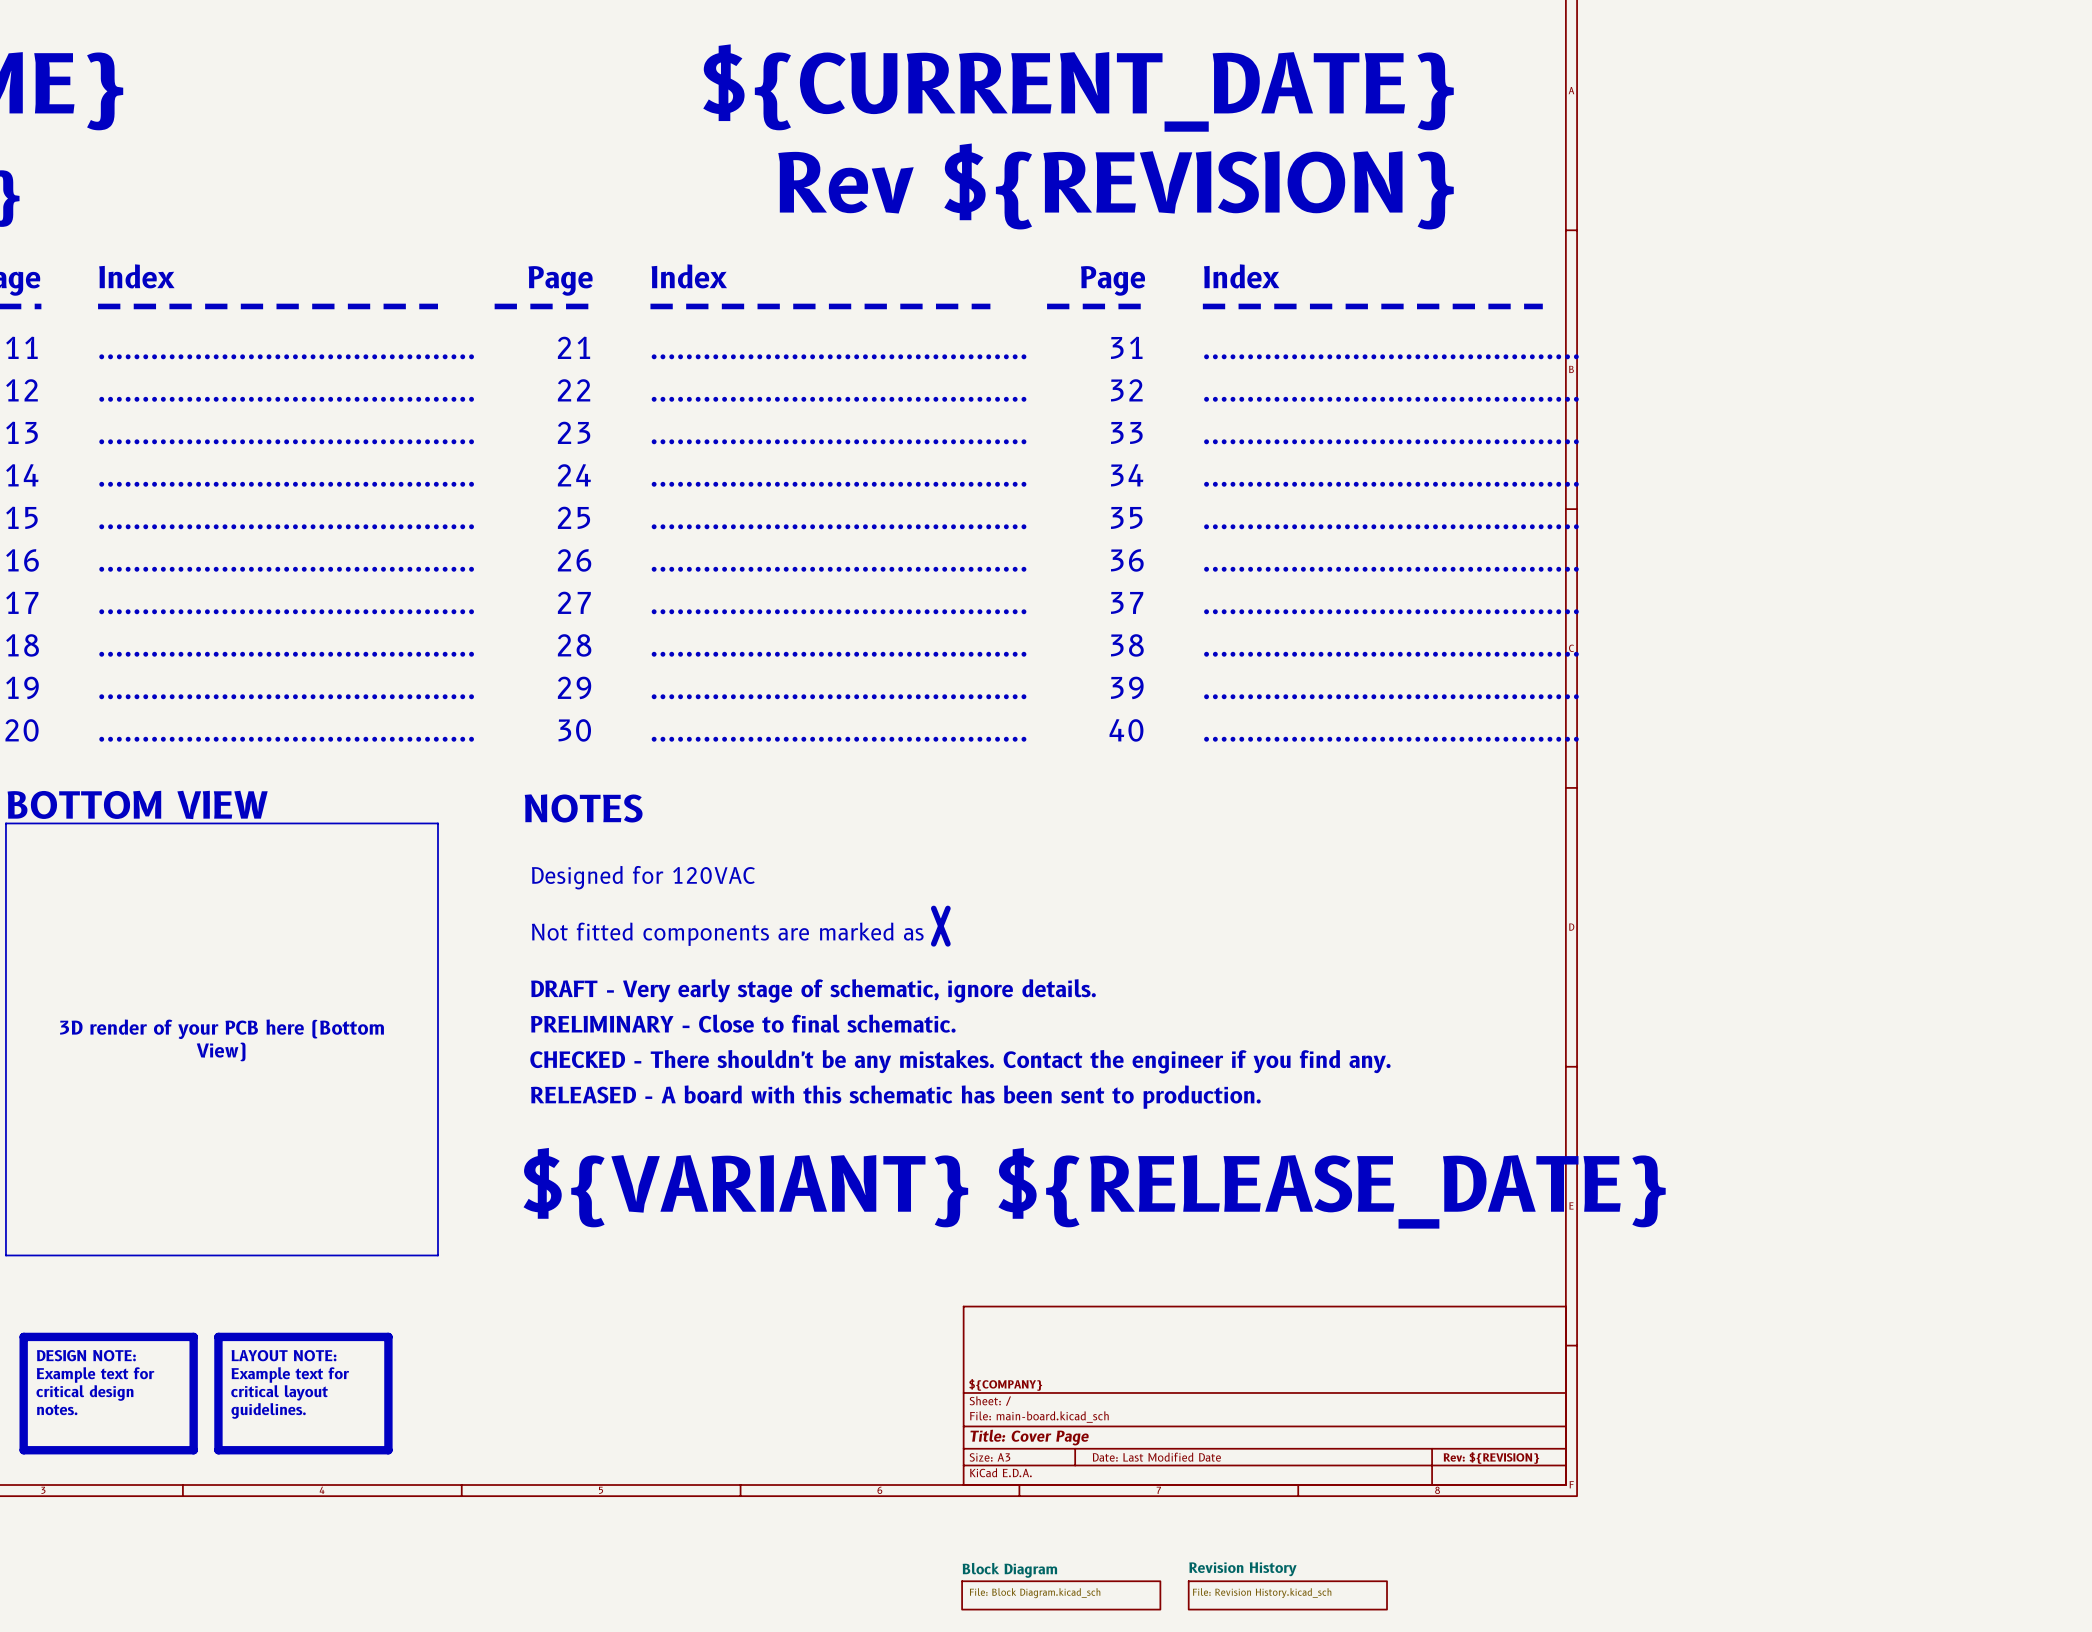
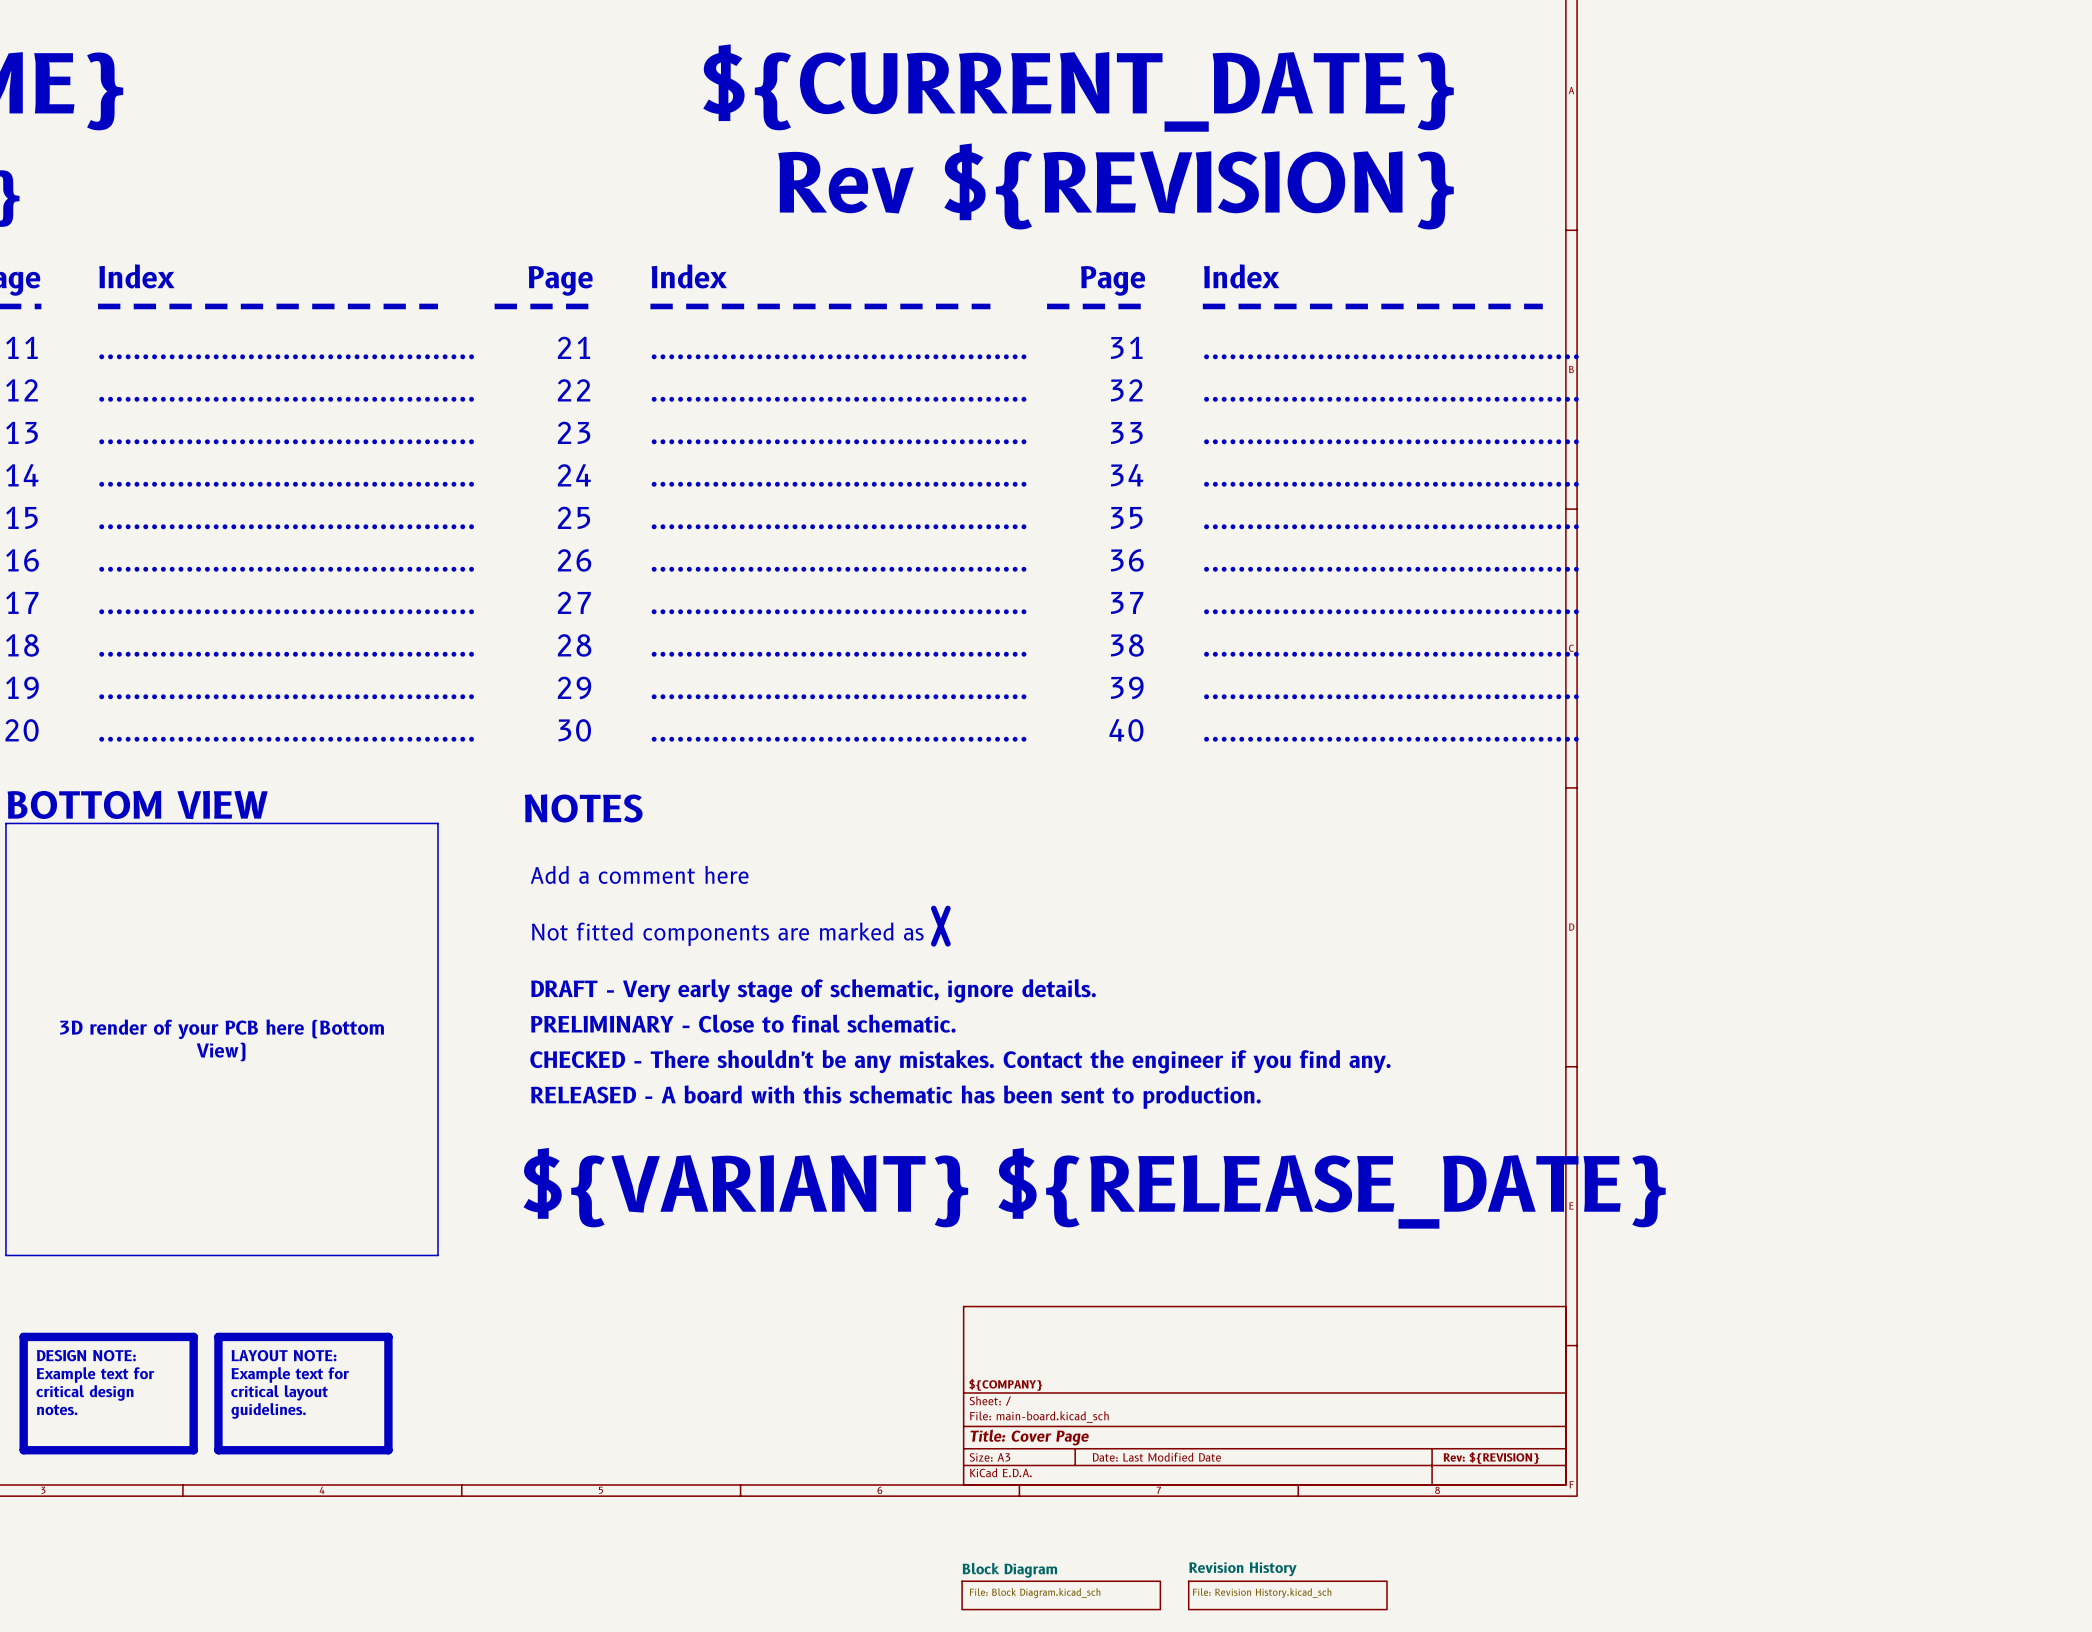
text: Designed for 120VAC (643, 877) -> Add a comment here (639, 874)

